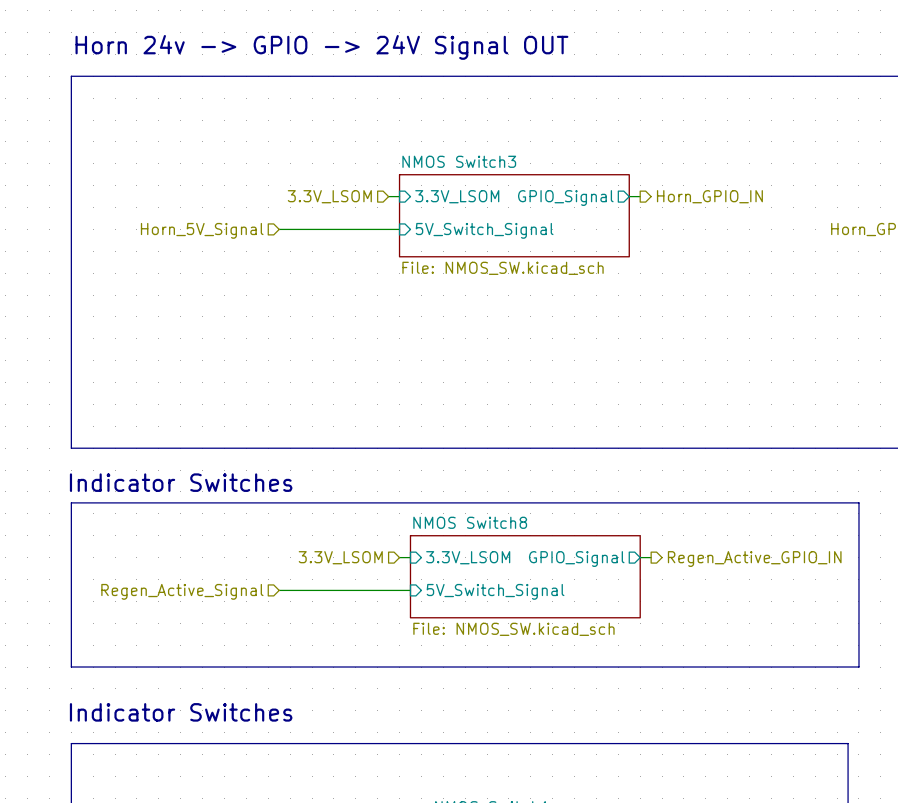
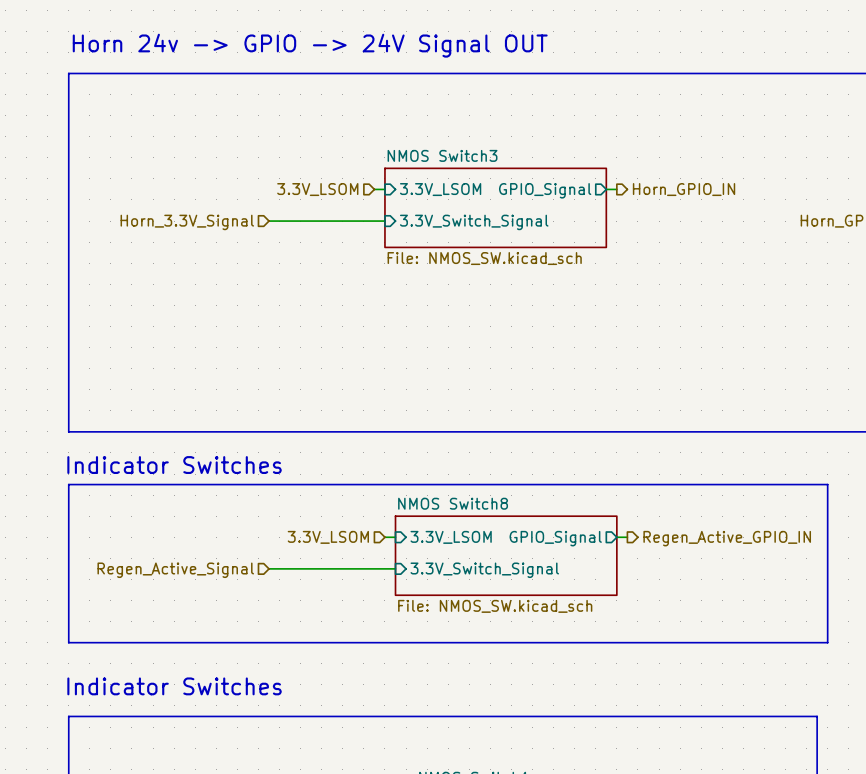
hierarchical label: Horn_5V_Signal (202, 230) -> Horn_3.3V_Signal (187, 222)
sheet pin: 5V_Switch_Signal (484, 230) -> 3.3V_Switch_Signal (474, 222)
sheet pin: 5V_Switch_Signal (495, 591) -> 3.3V_Switch_Signal (484, 570)

